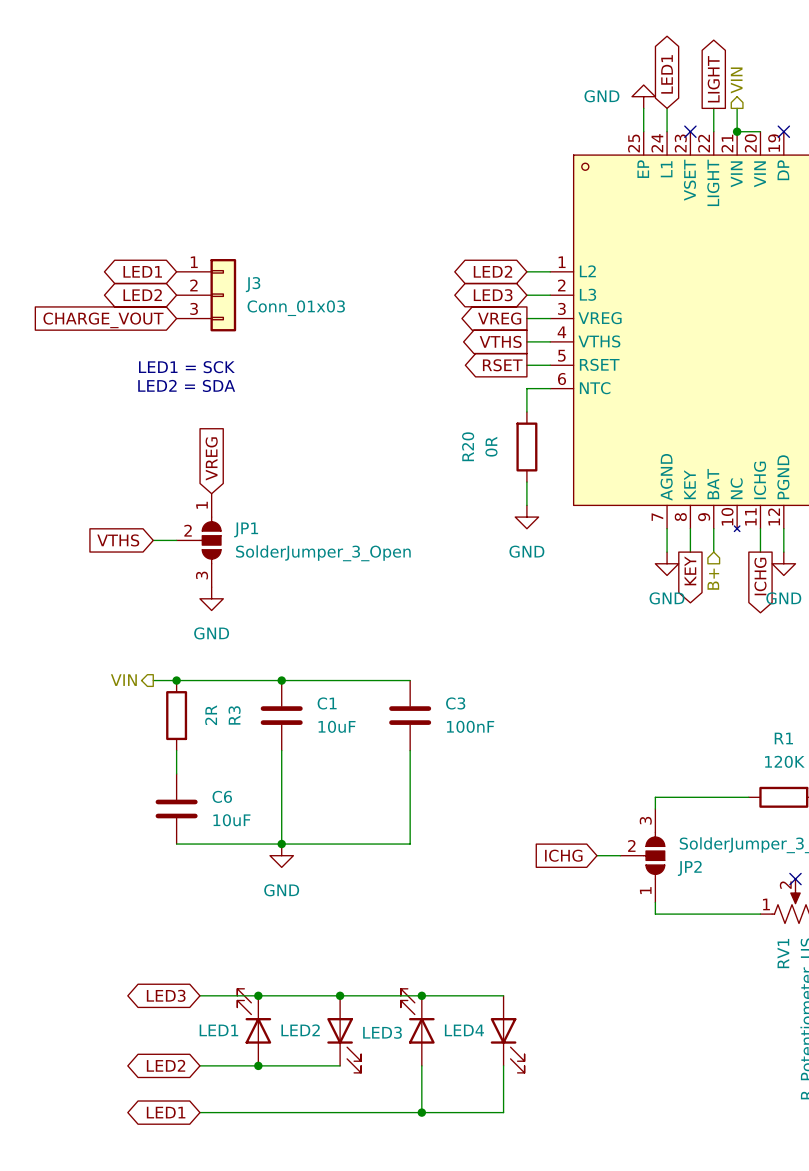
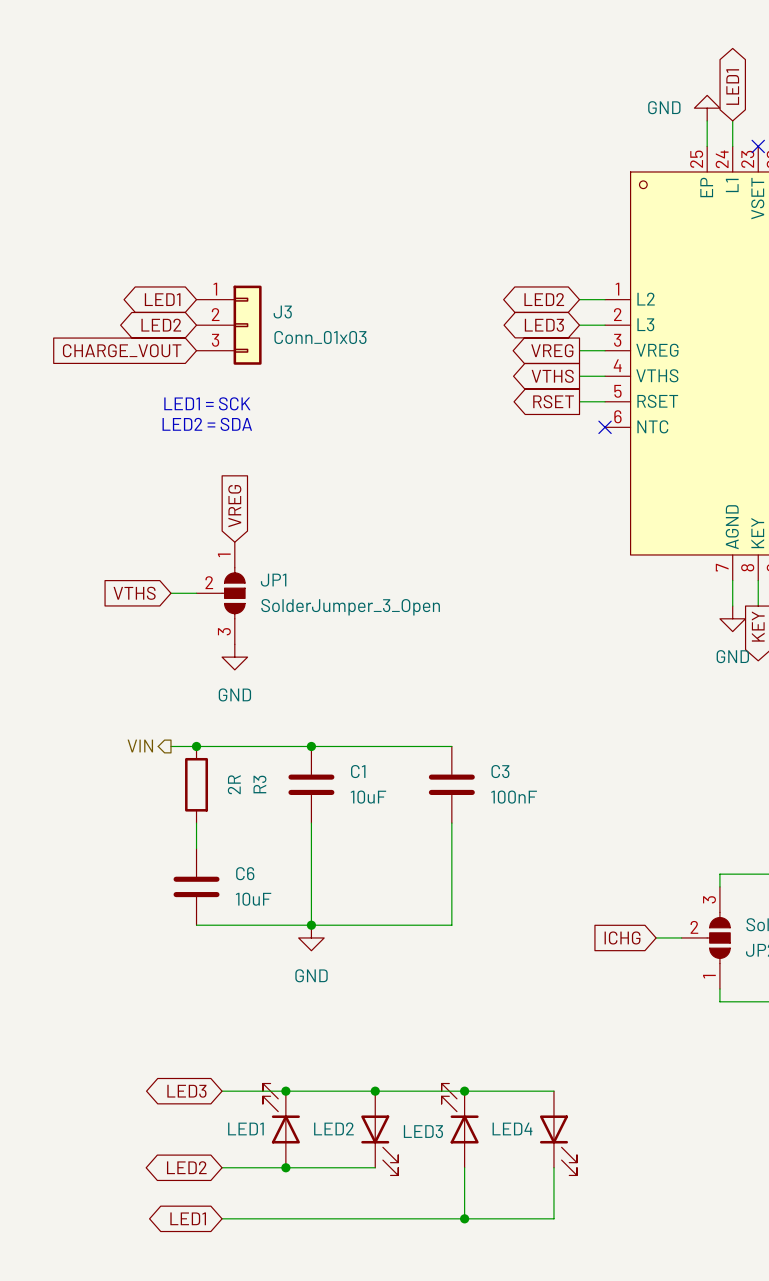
wire: (550, 388) (526, 388) (526, 411) -> none
no-connect mark: none -> (605, 427)
R20: 0R (526, 447) -> none
wire: (526, 482) (526, 505) -> none
power symbol: GND (526, 517) -> none

